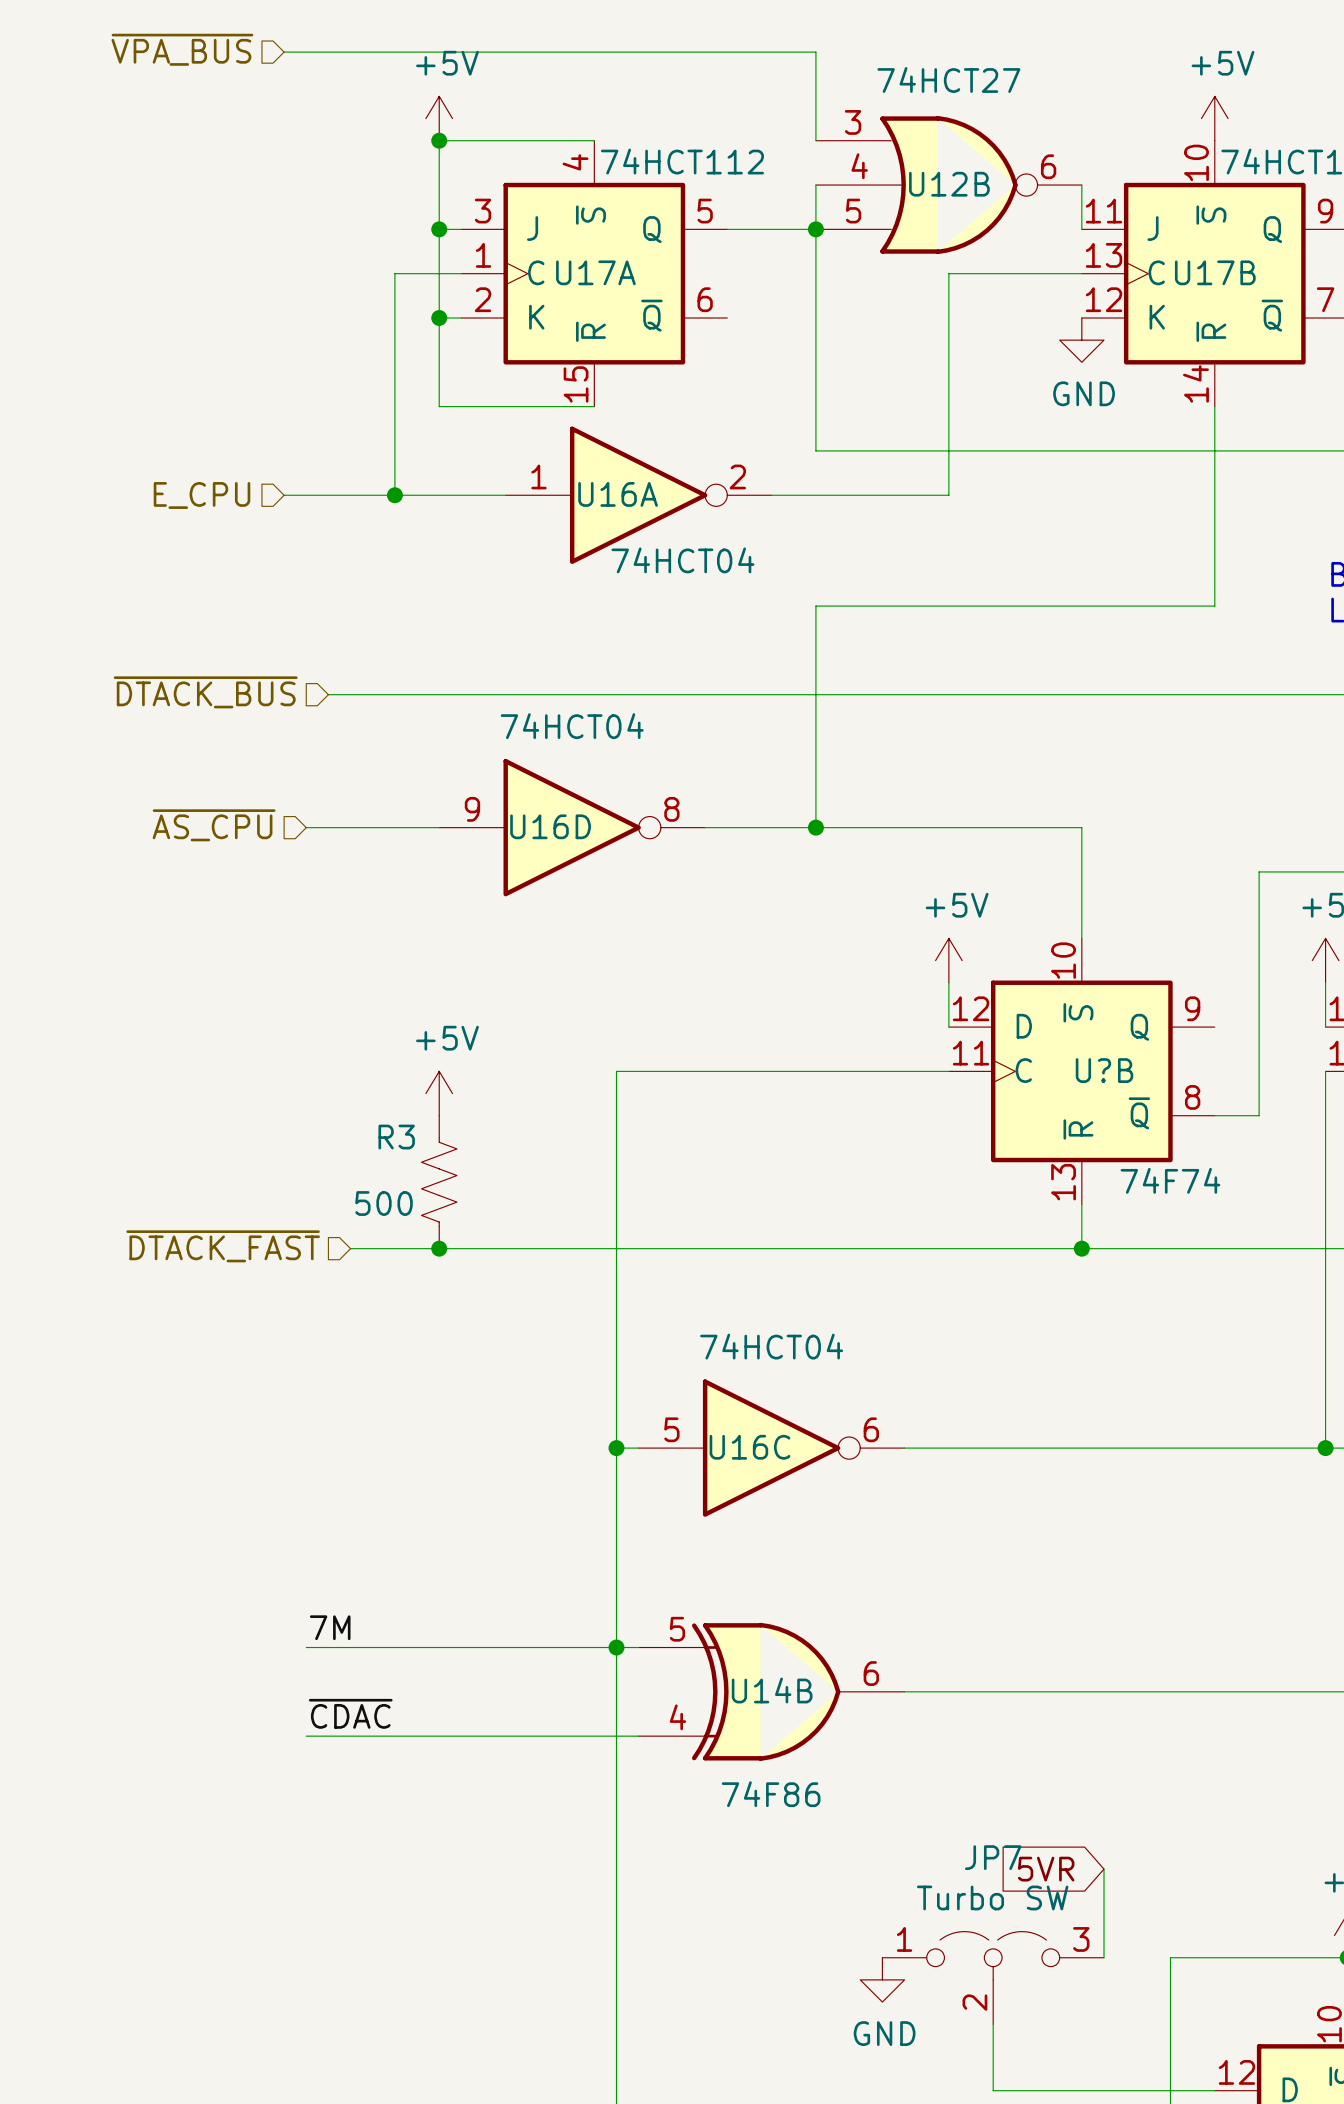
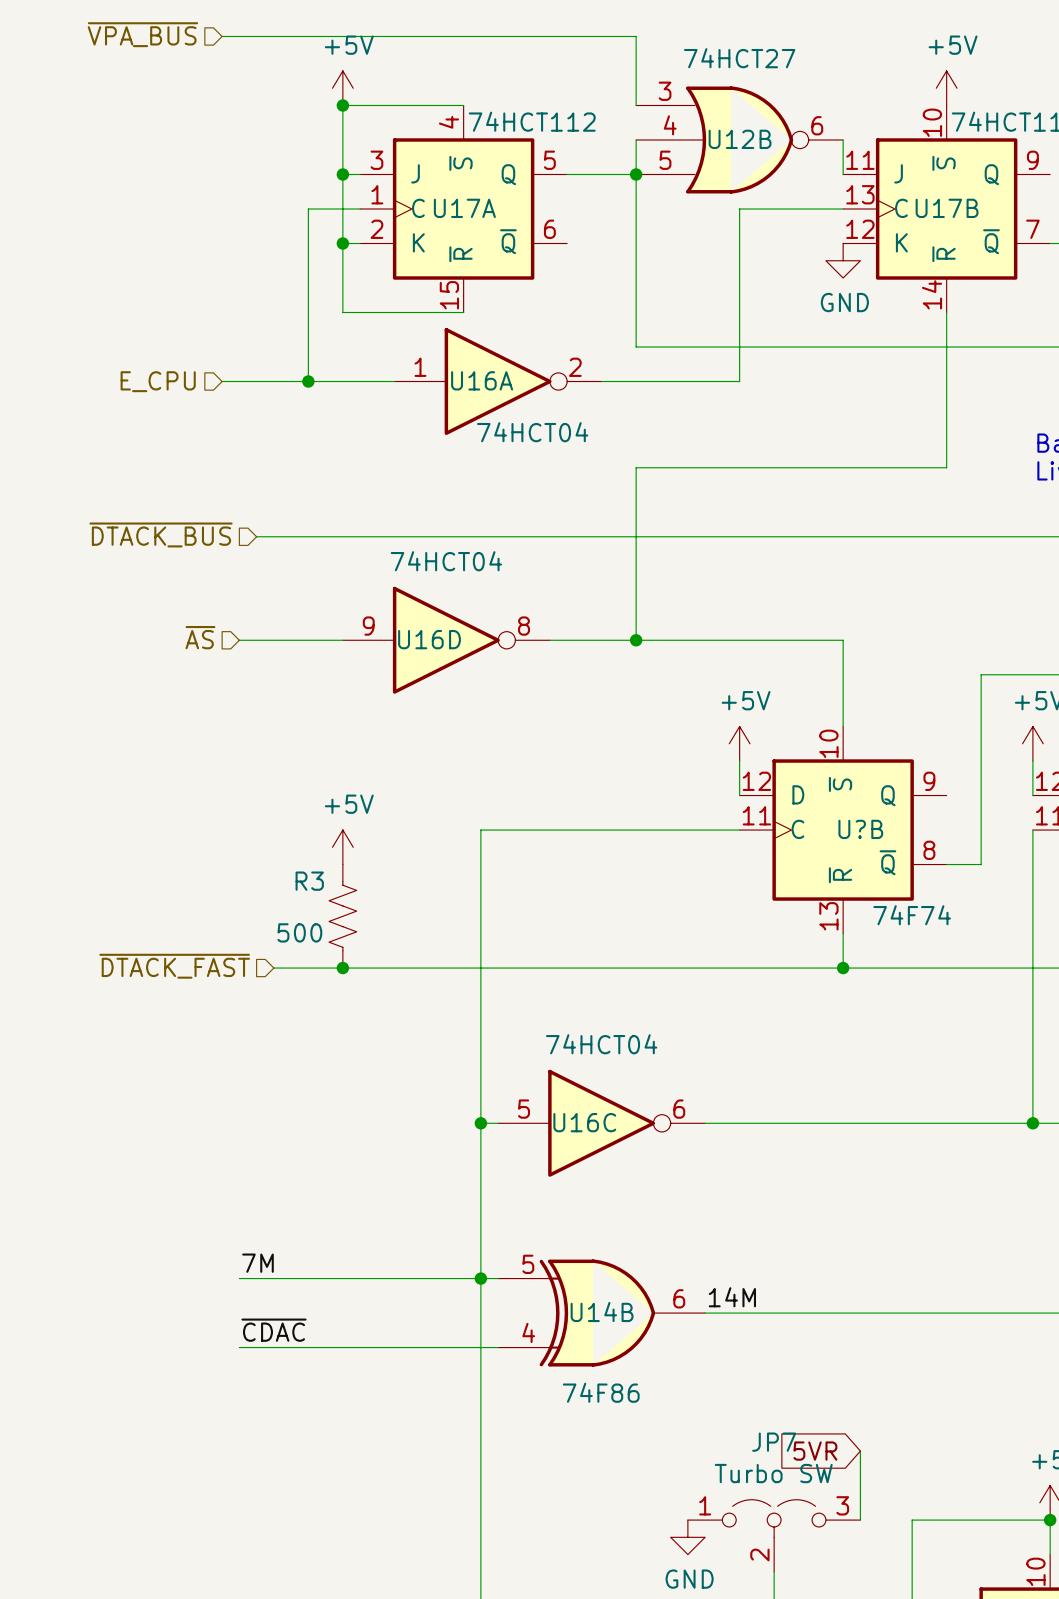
hierarchical label: ~{AS_CPU} (214, 825) -> ~{AS} (200, 637)
label: none -> 14M (732, 1297)

